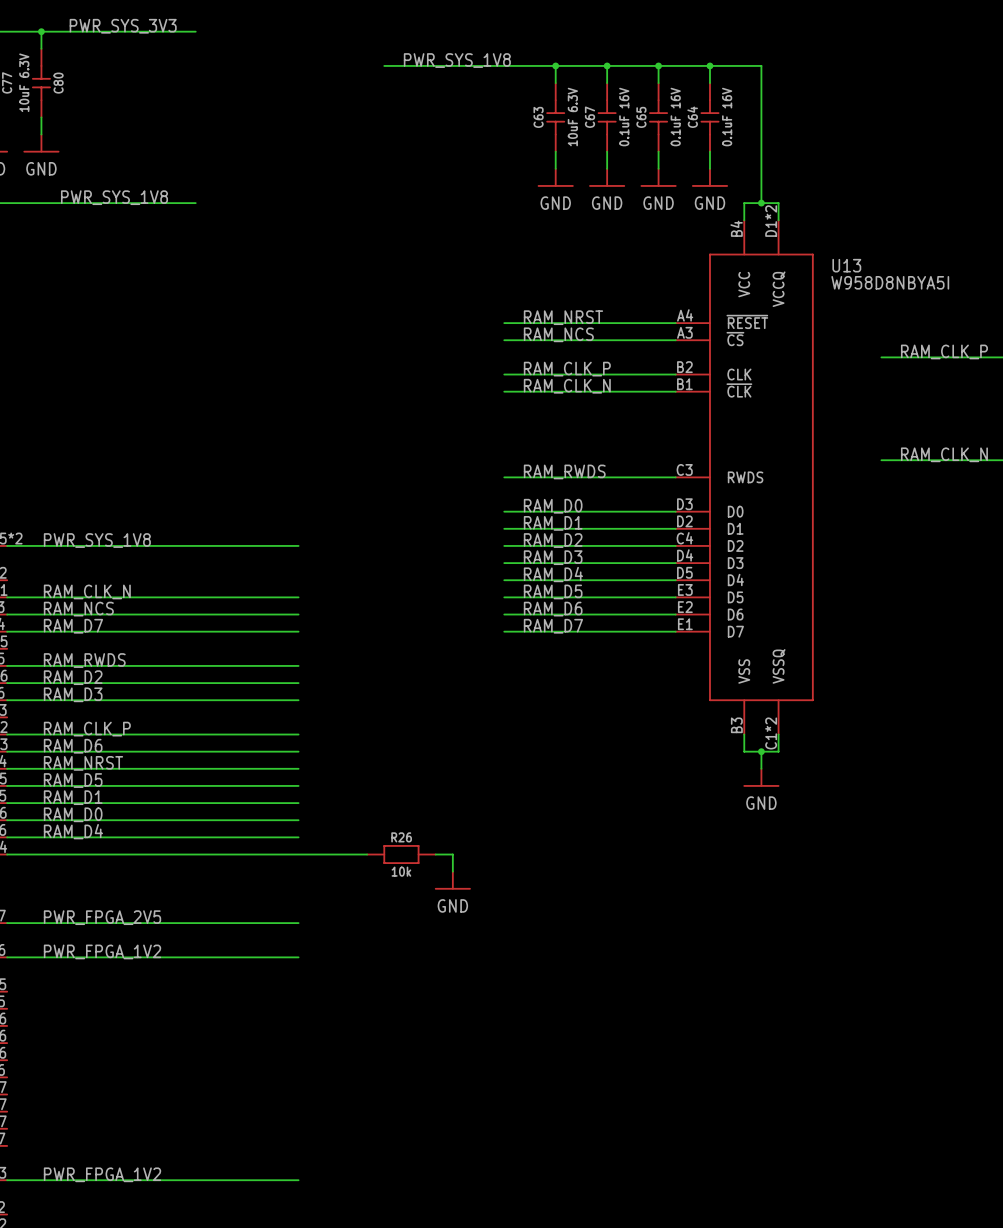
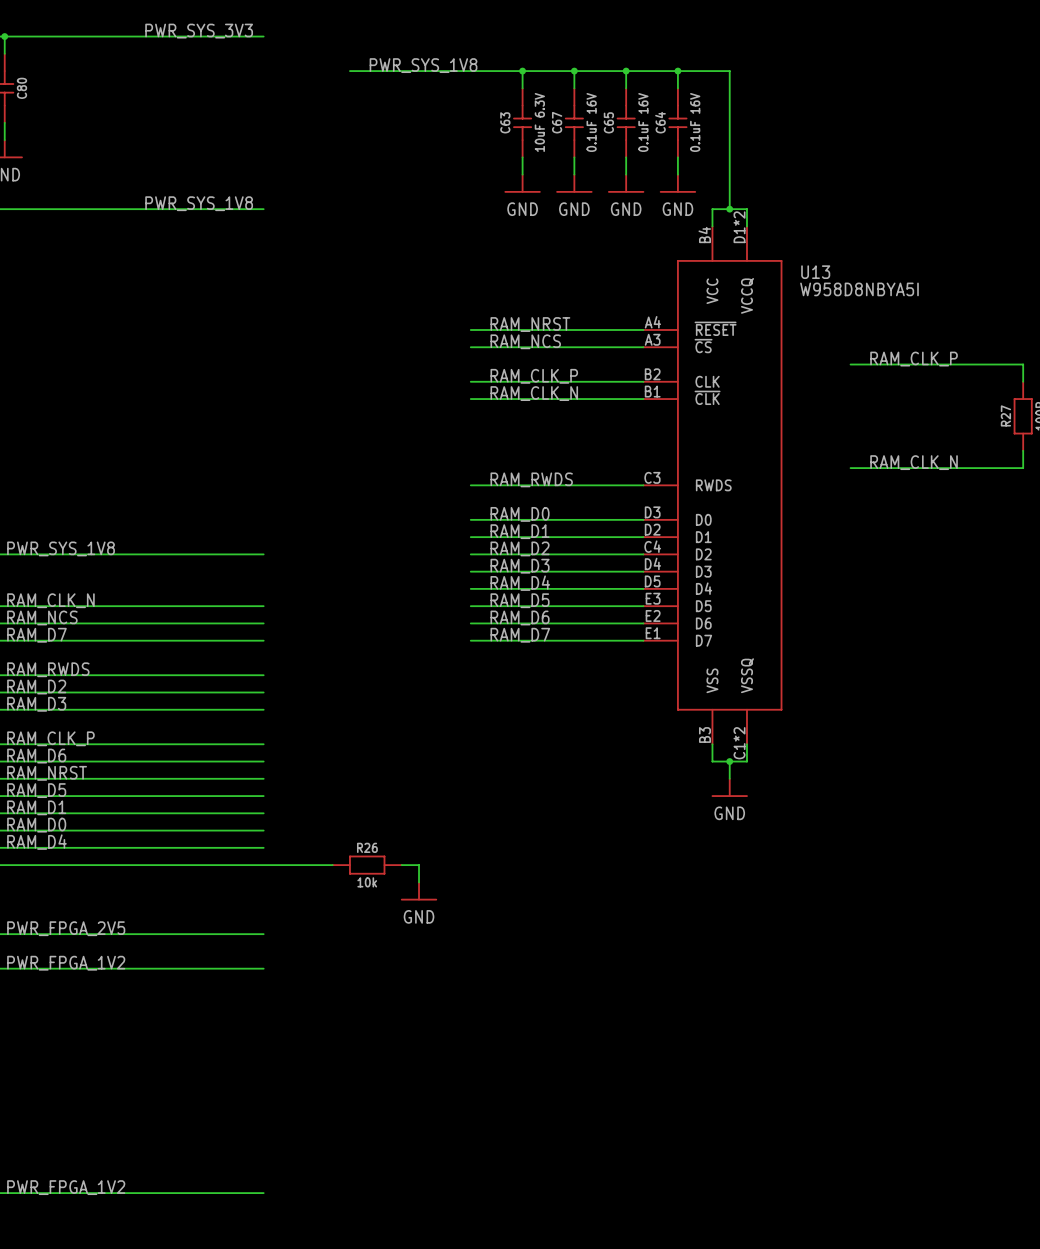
label position: PWR_SYS_3V3 (123, 26) -> PWR_SYS_3V3 (199, 31)
wire: none -> (160, 36) (263, 36)
label position: PWR_SYS_1V8 (114, 197) -> PWR_SYS_1V8 (199, 203)
wire: none -> (160, 209) (263, 209)

